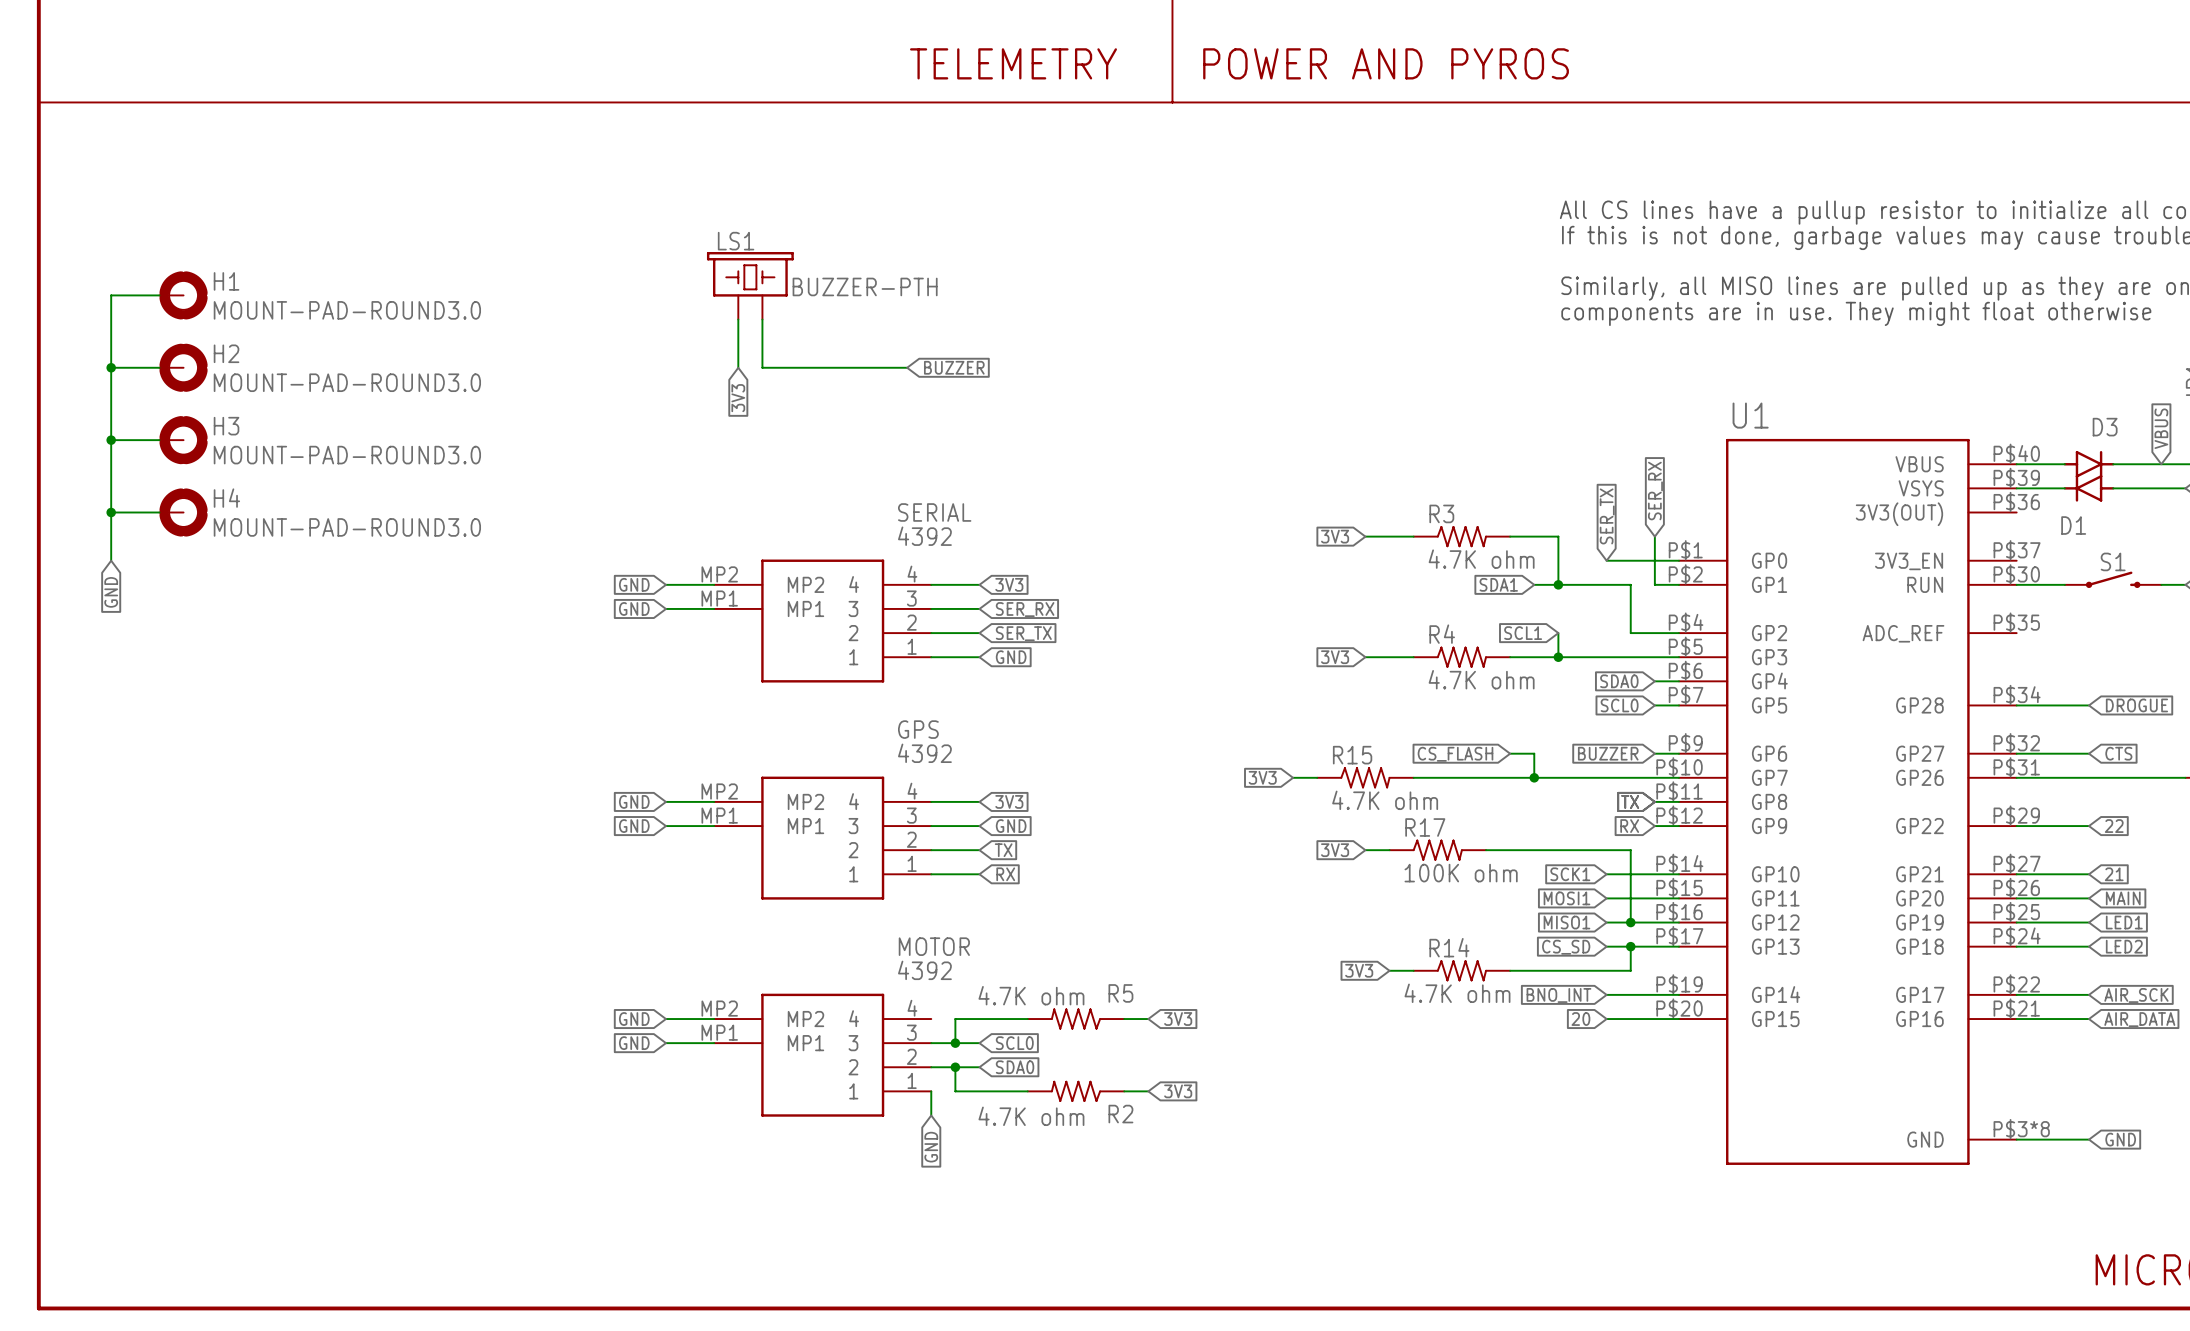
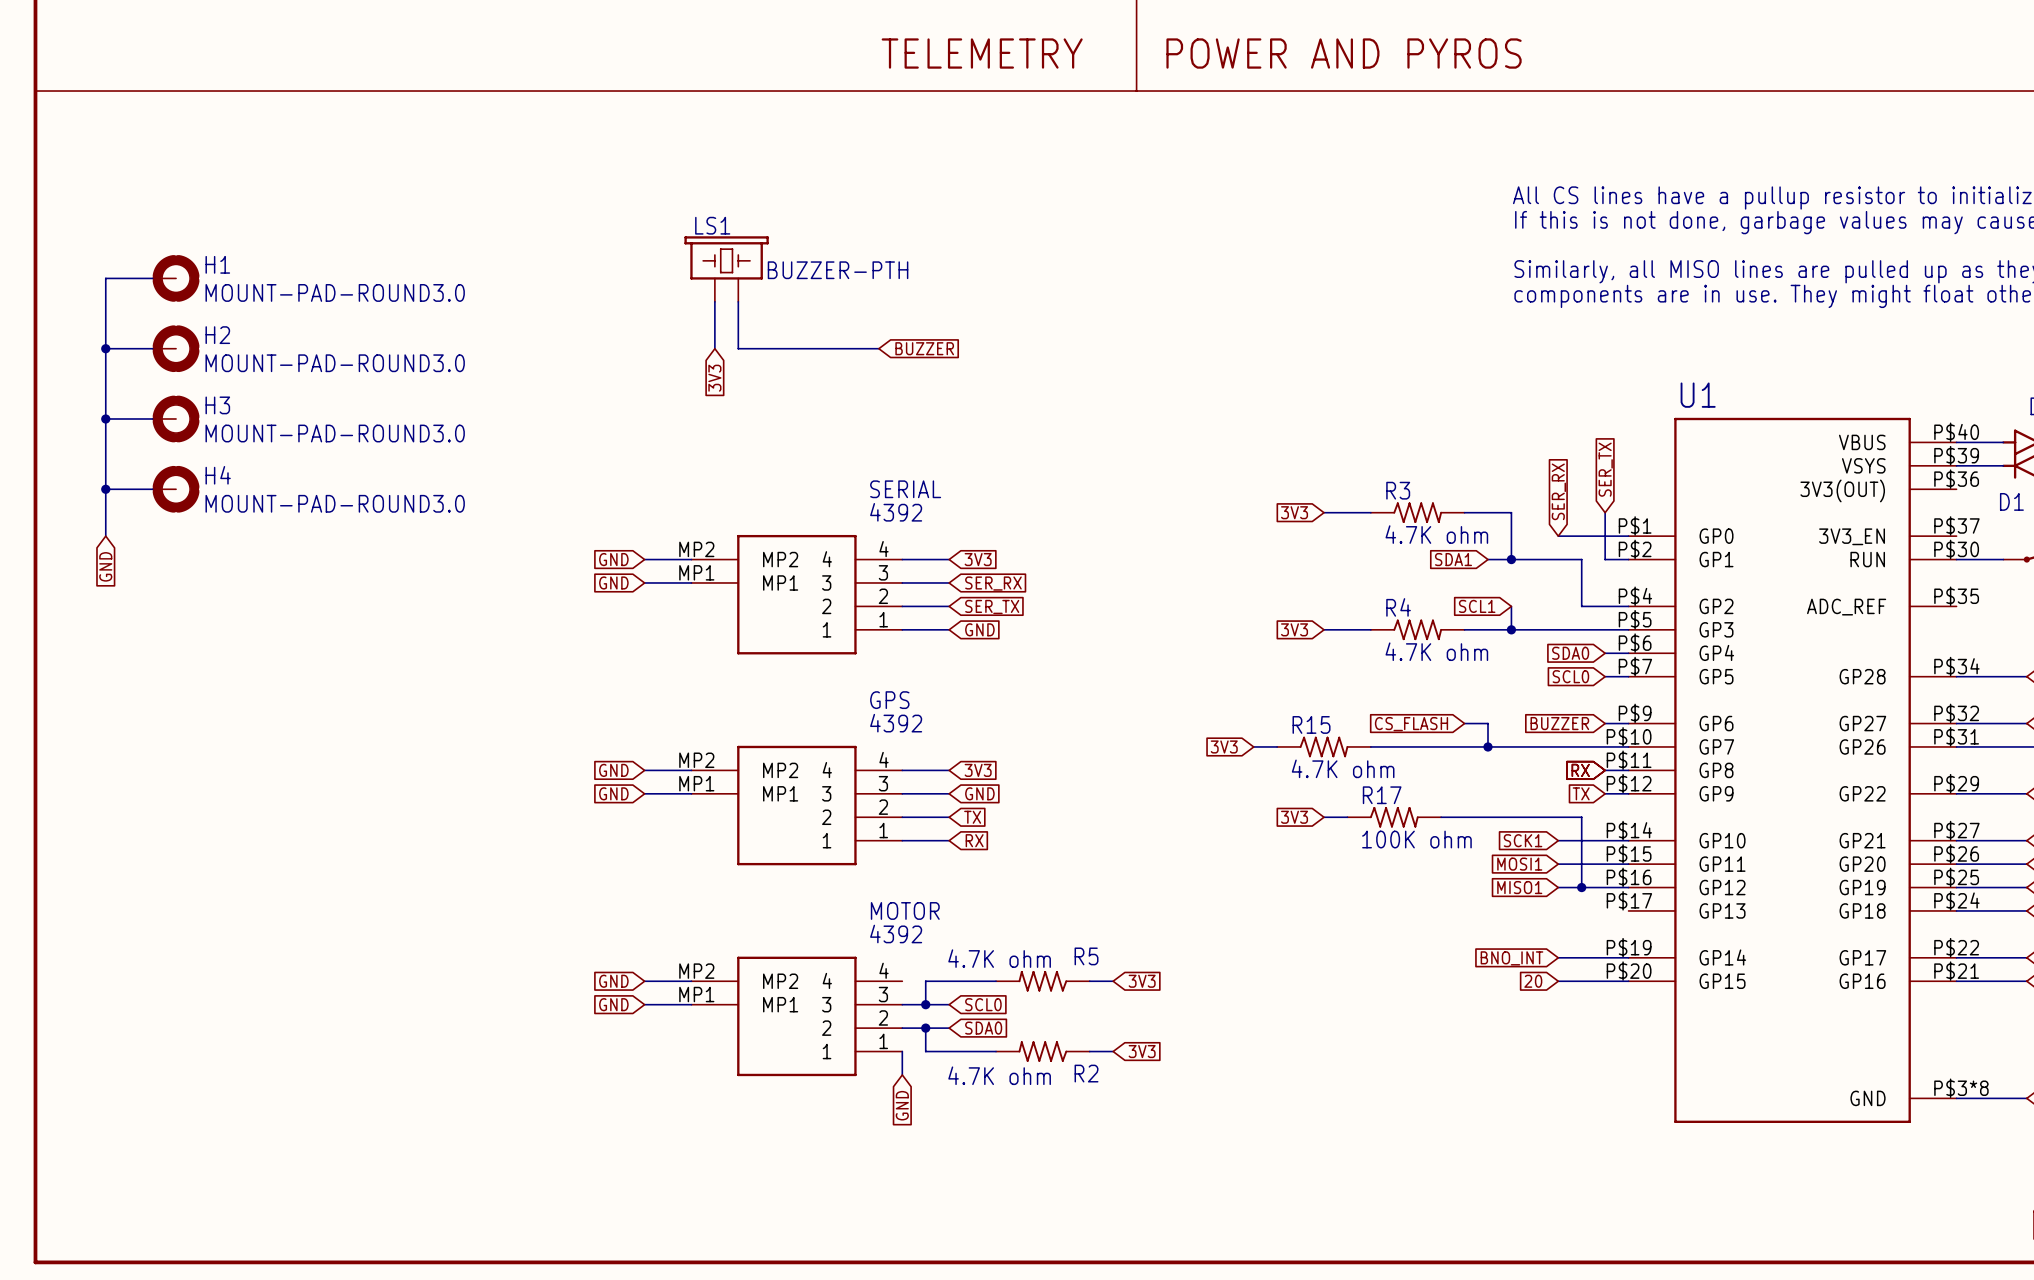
global label: SER_RX (1655, 491) -> SER_TX (1605, 469)
global label: SER_TX (1607, 516) -> SER_RX (1558, 491)
global label: TX (1630, 801) -> RX (1580, 770)
global label: RX (1629, 826) -> TX (1581, 793)
wire: (1606, 946) (1678, 946) -> none
wire: (1630, 946) (1630, 970) (1510, 970) -> none
junction: (1630, 946) -> none
global label: CS_SD (1566, 947) -> none
global label: 3V3 (1359, 970) -> none
wire: (1389, 970) (1413, 970) -> none
R14: 4.7K ohm (1461, 970) -> none

